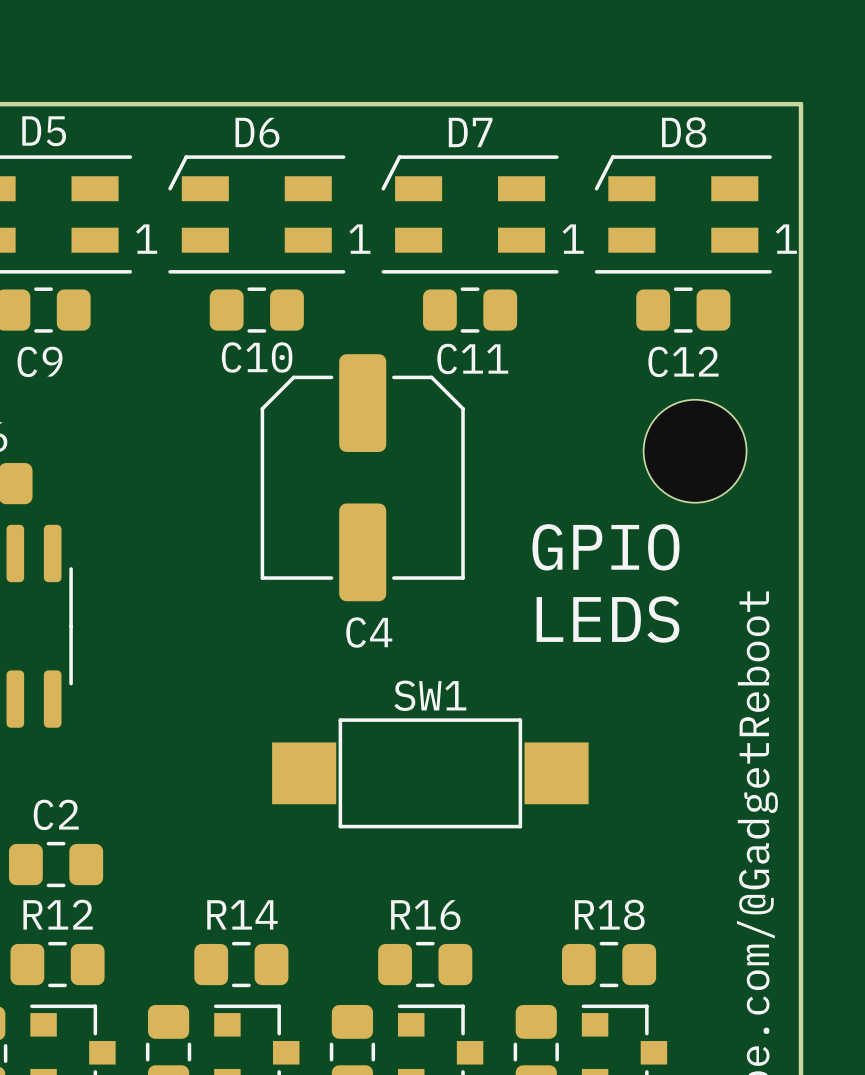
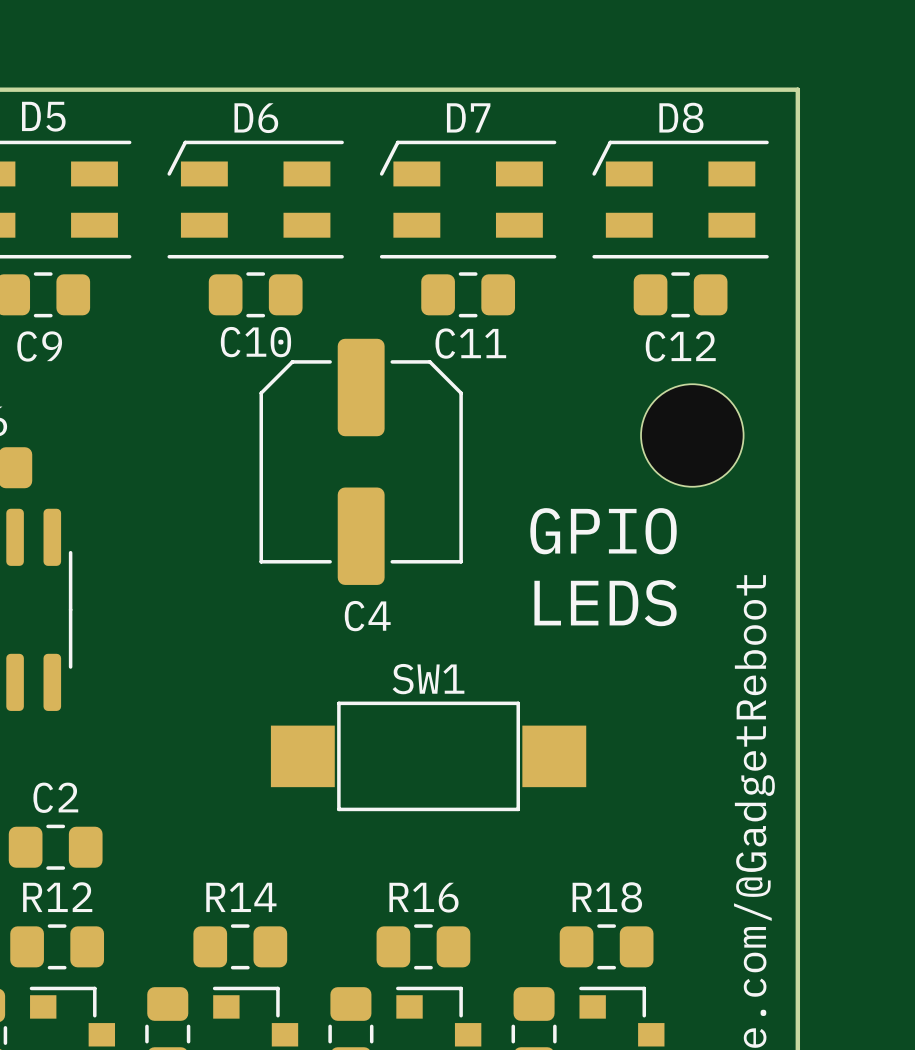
D5 text: 1 (146, 239) -> none
D6 text: 1 (359, 239) -> none
D7 text: 1 (573, 239) -> none
D8 text: 1 (786, 239) -> none

